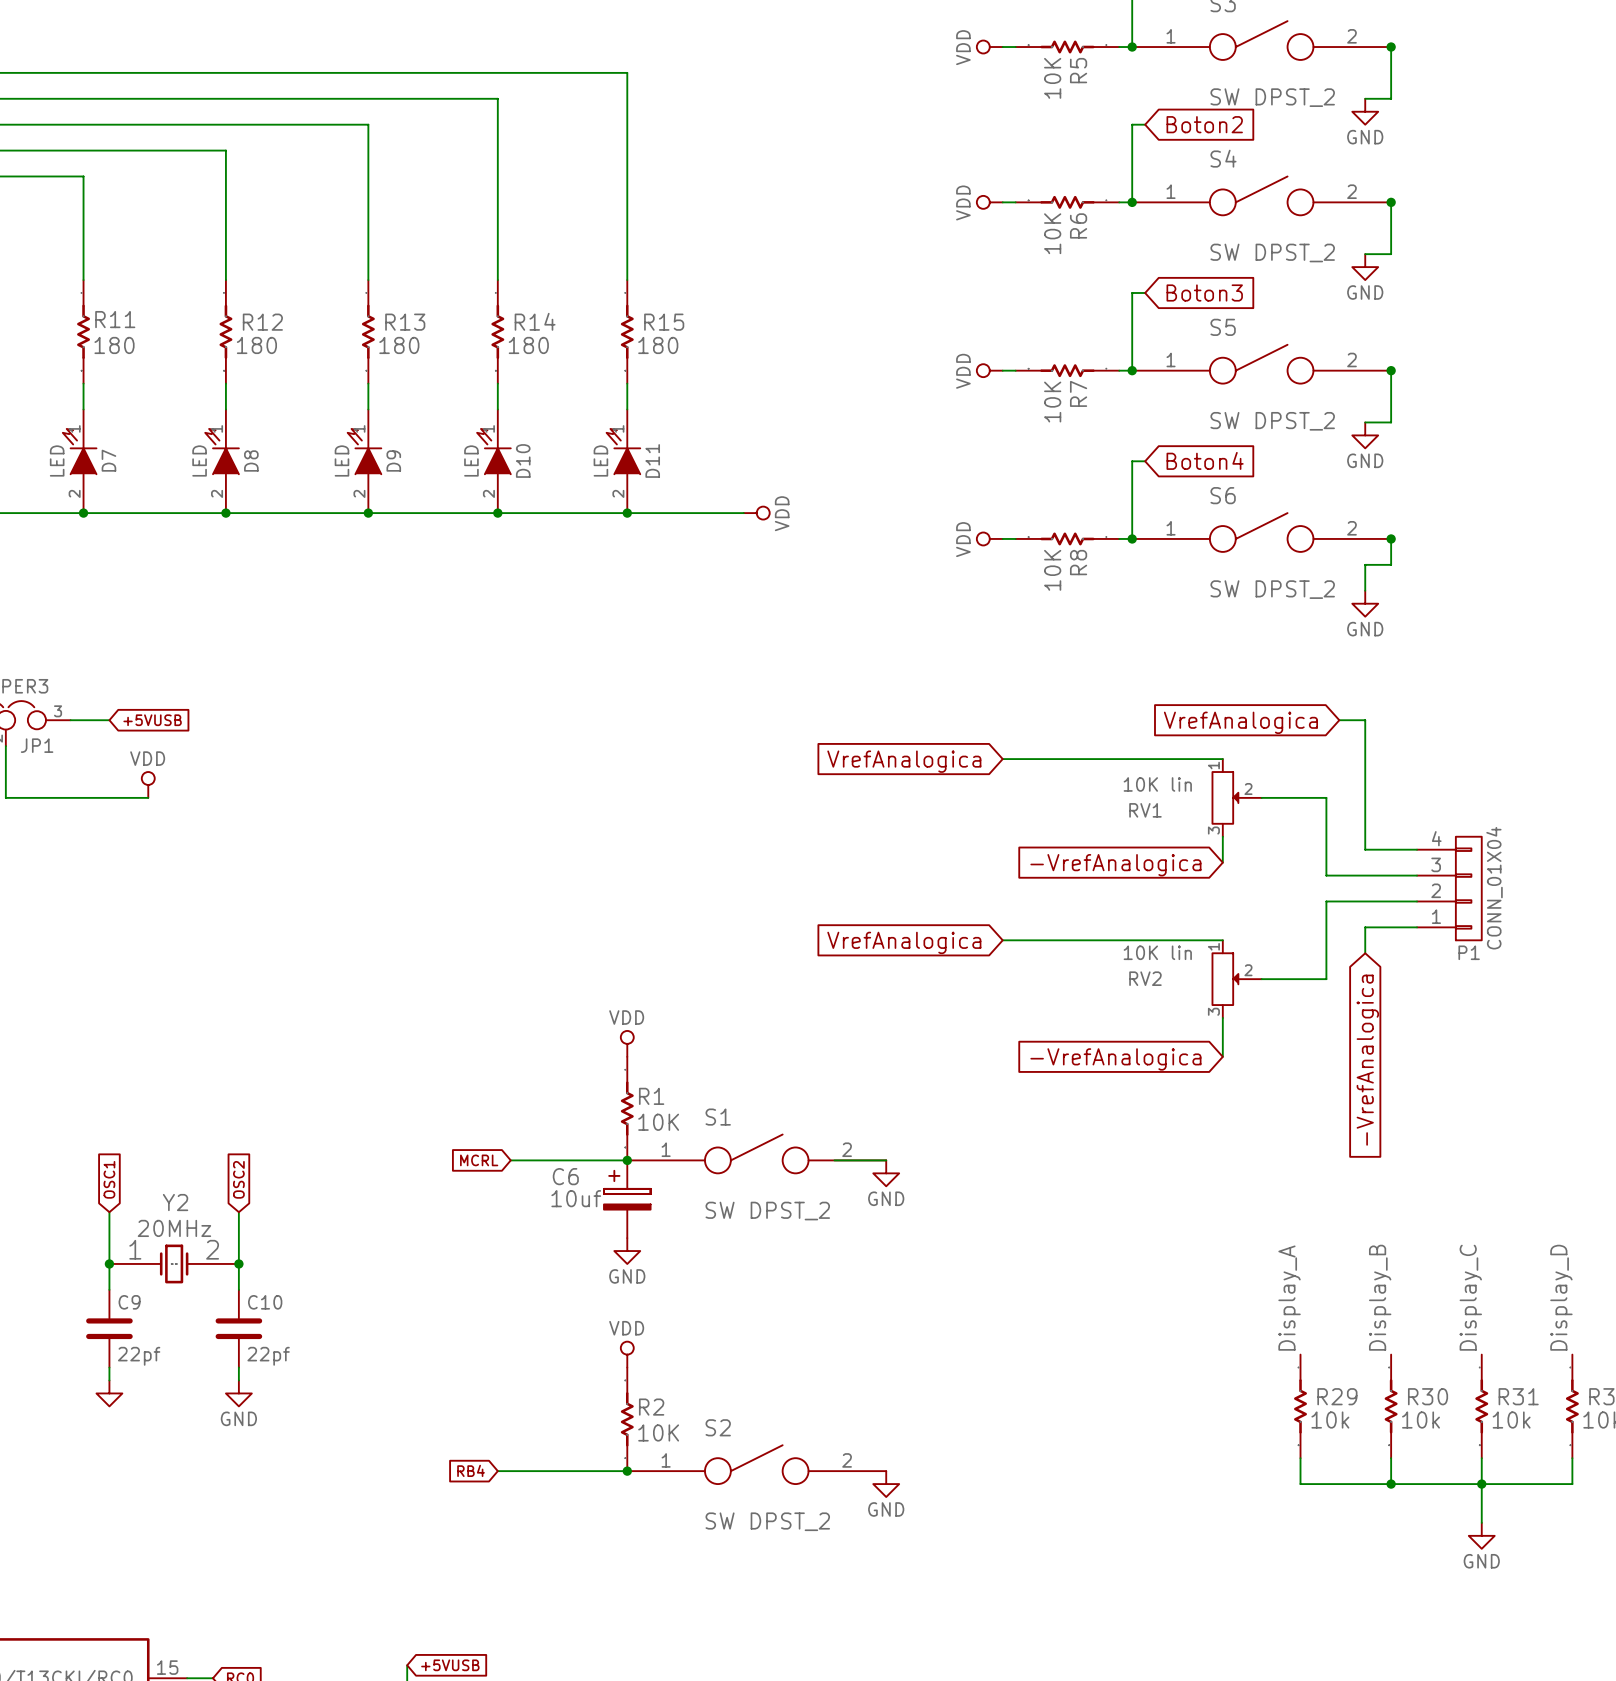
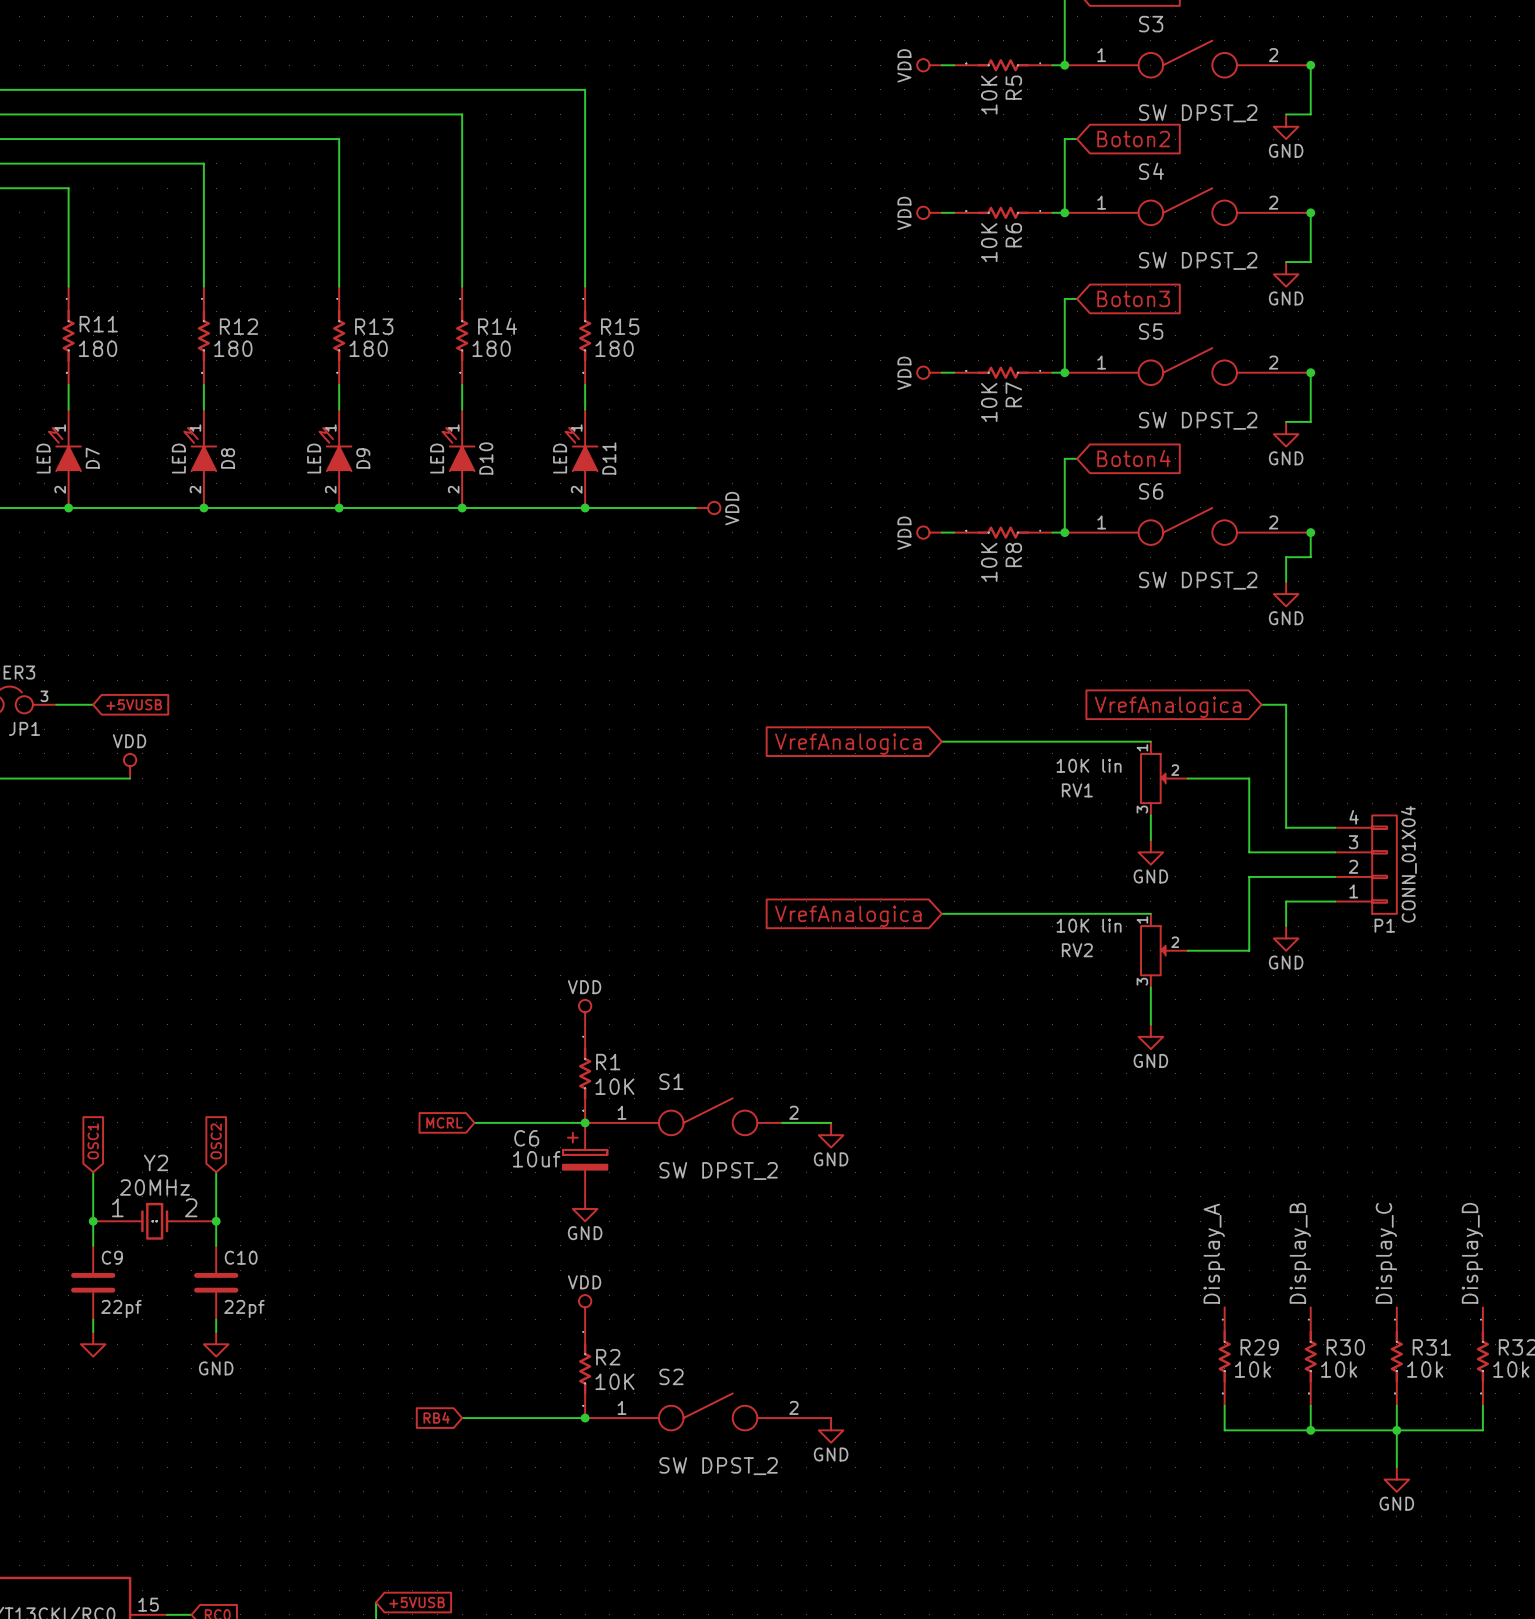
global label: -VrefAnalogica (1115, 865) -> none
power symbol: none -> GND (1150, 852)
power symbol: none -> GND (1286, 938)
global label: -VrefAnalogica (1115, 1059) -> none
global label: -VrefAnalogica (1367, 1060) -> none
power symbol: none -> GND (1150, 1036)

